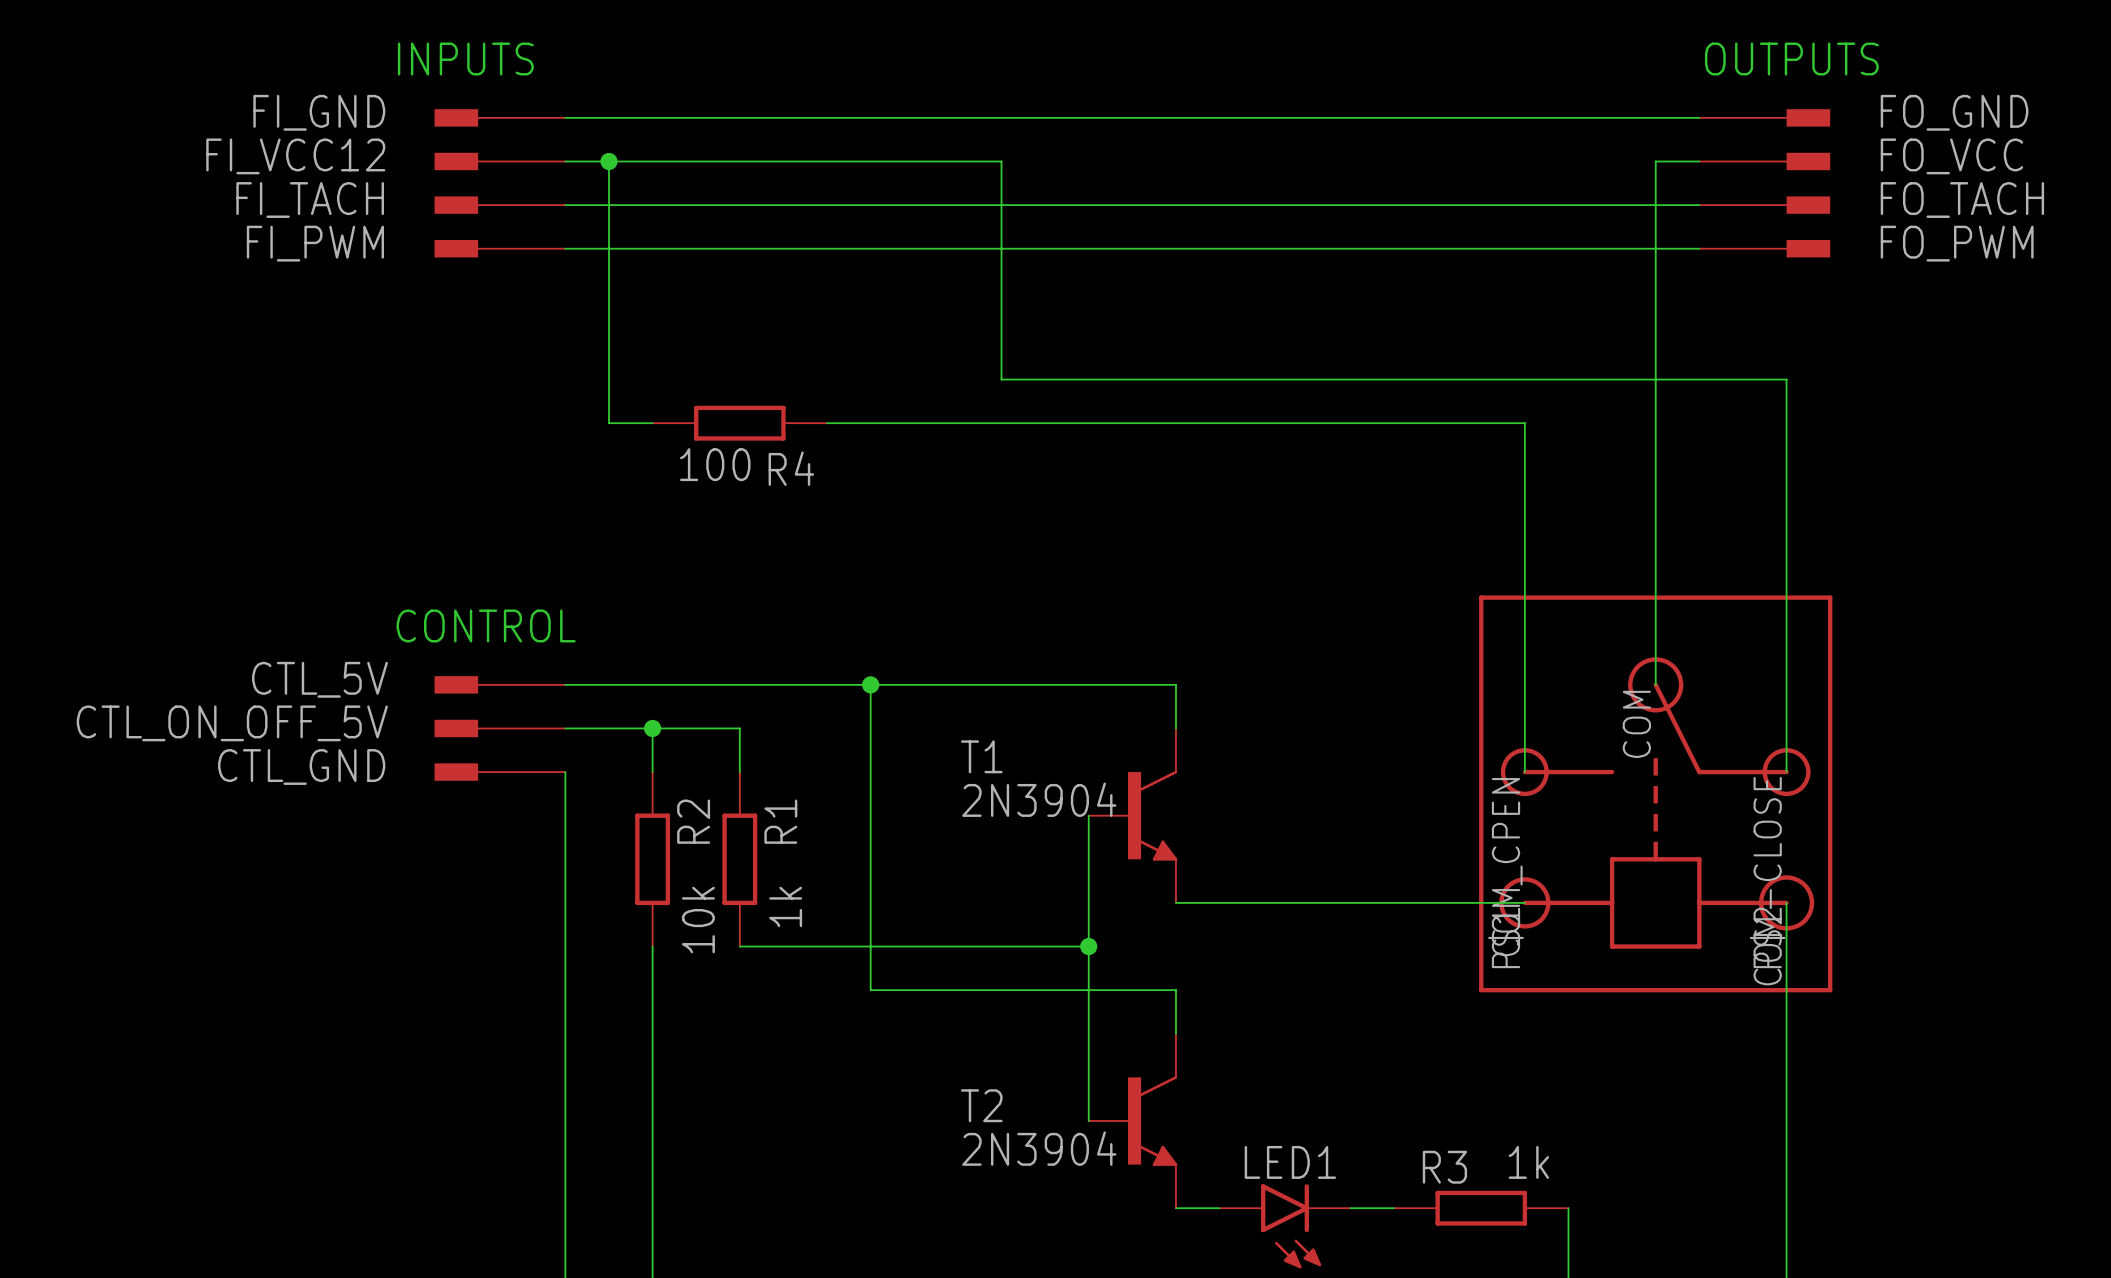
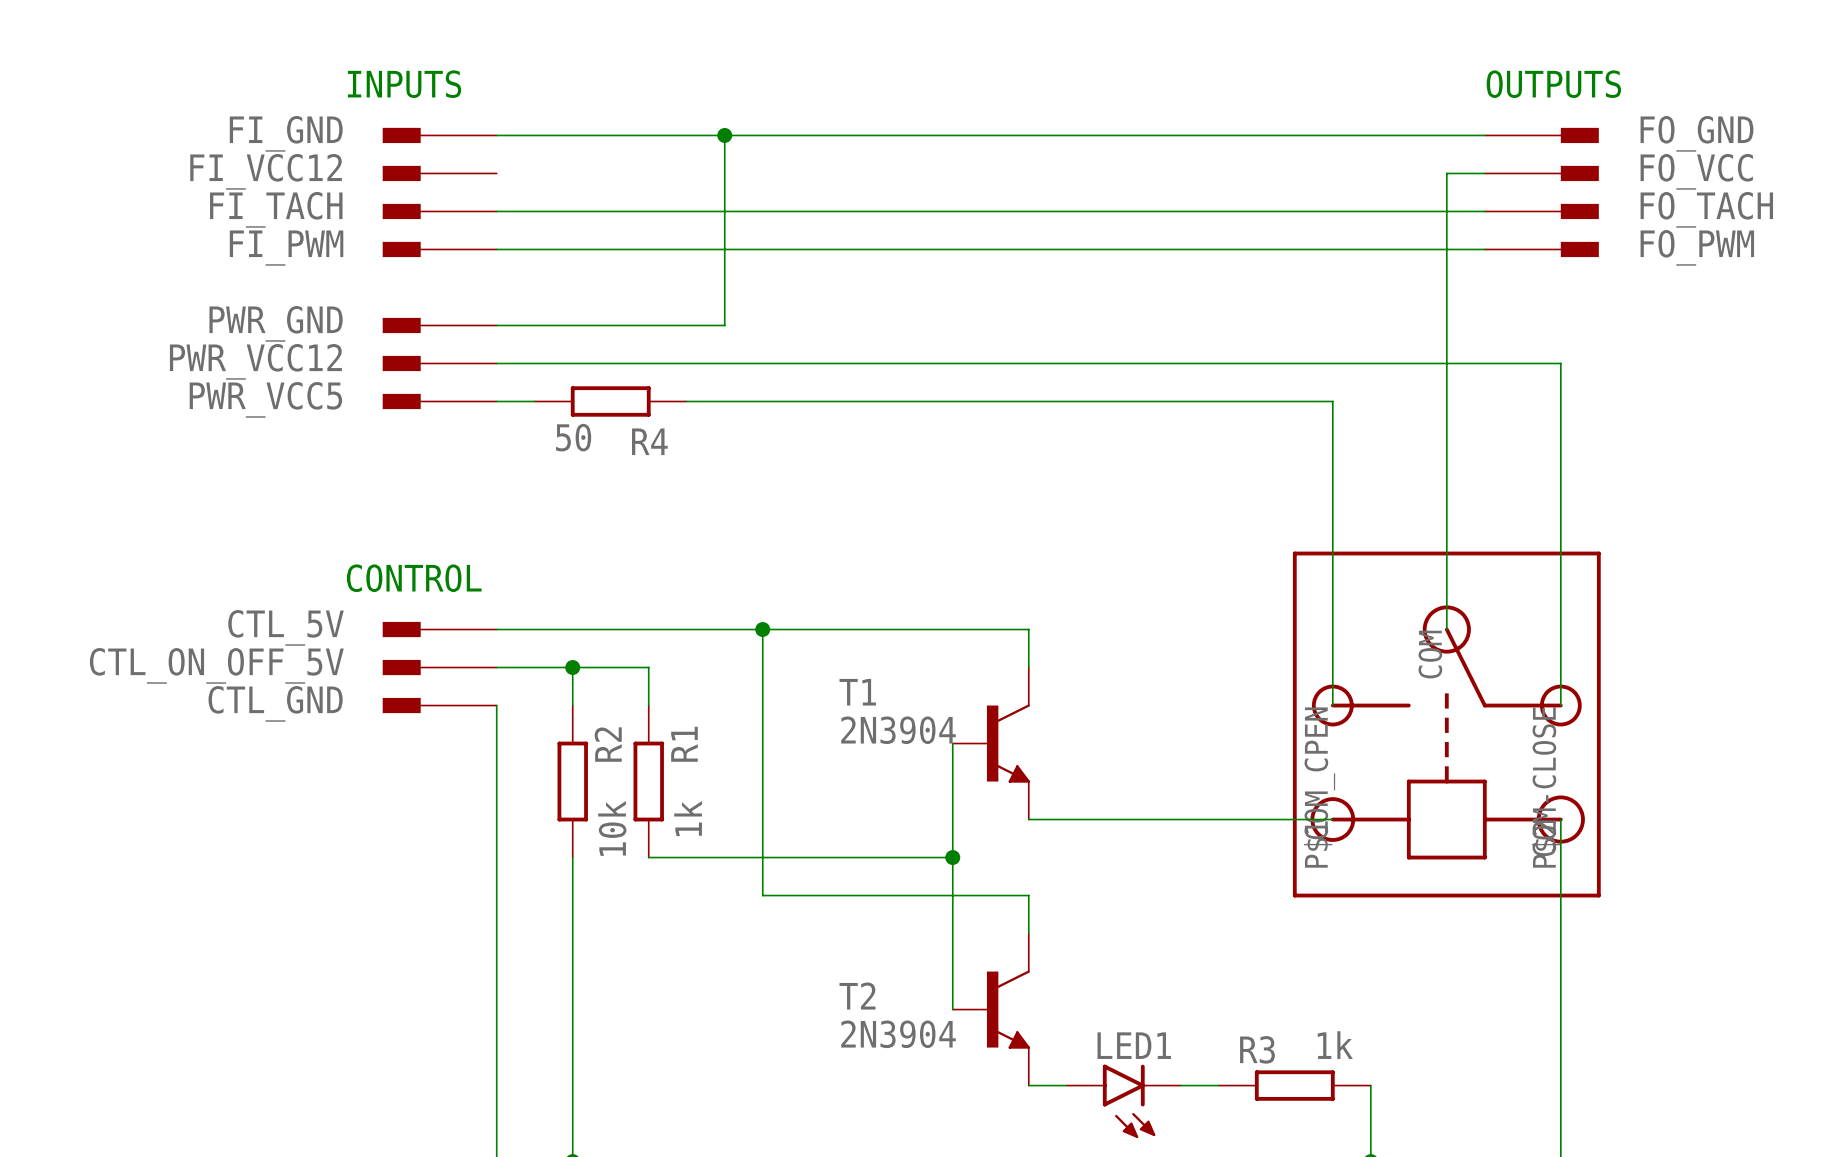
wire: none -> (724, 135) (724, 325) (496, 325)
junction: none -> (724, 135)
wire: (565, 161) (1001, 161) (1001, 379) -> (496, 363) (876, 363)
wire: (608, 161) (608, 423) (652, 423) -> none
junction: (608, 161) -> none
PWR_GND: none -> (439, 325)
PWR_VCC12: none -> (439, 363)
PWR_VCC5: none -> (439, 401)
wire: none -> (496, 401) (534, 401)
R4 position: (739, 423) -> (610, 401)
R4 value: 100 (715, 464) -> 50 (573, 437)

